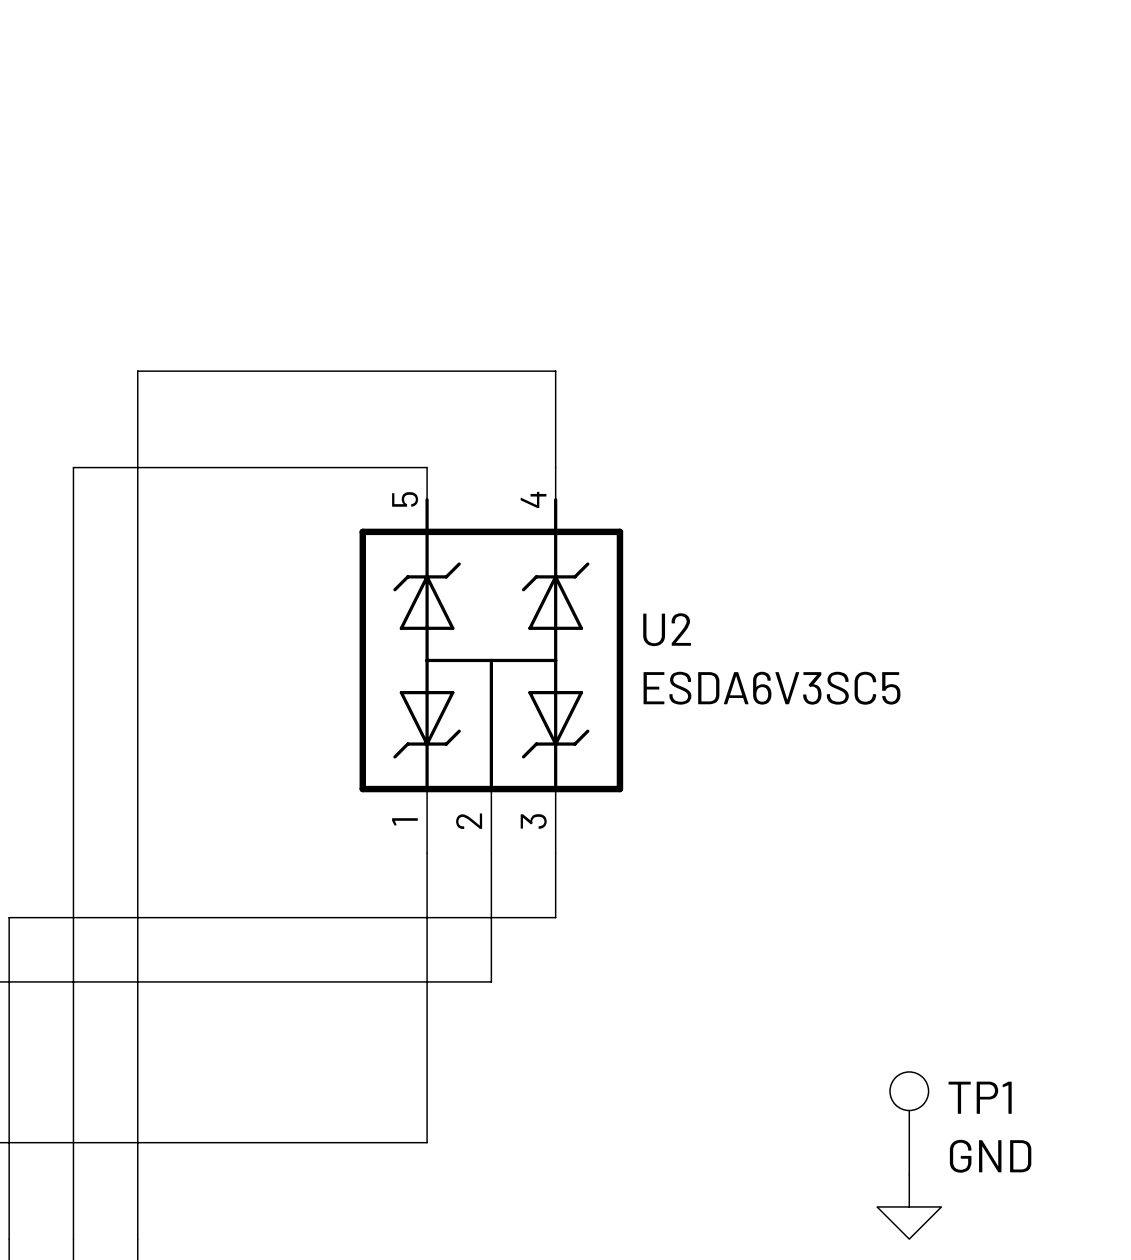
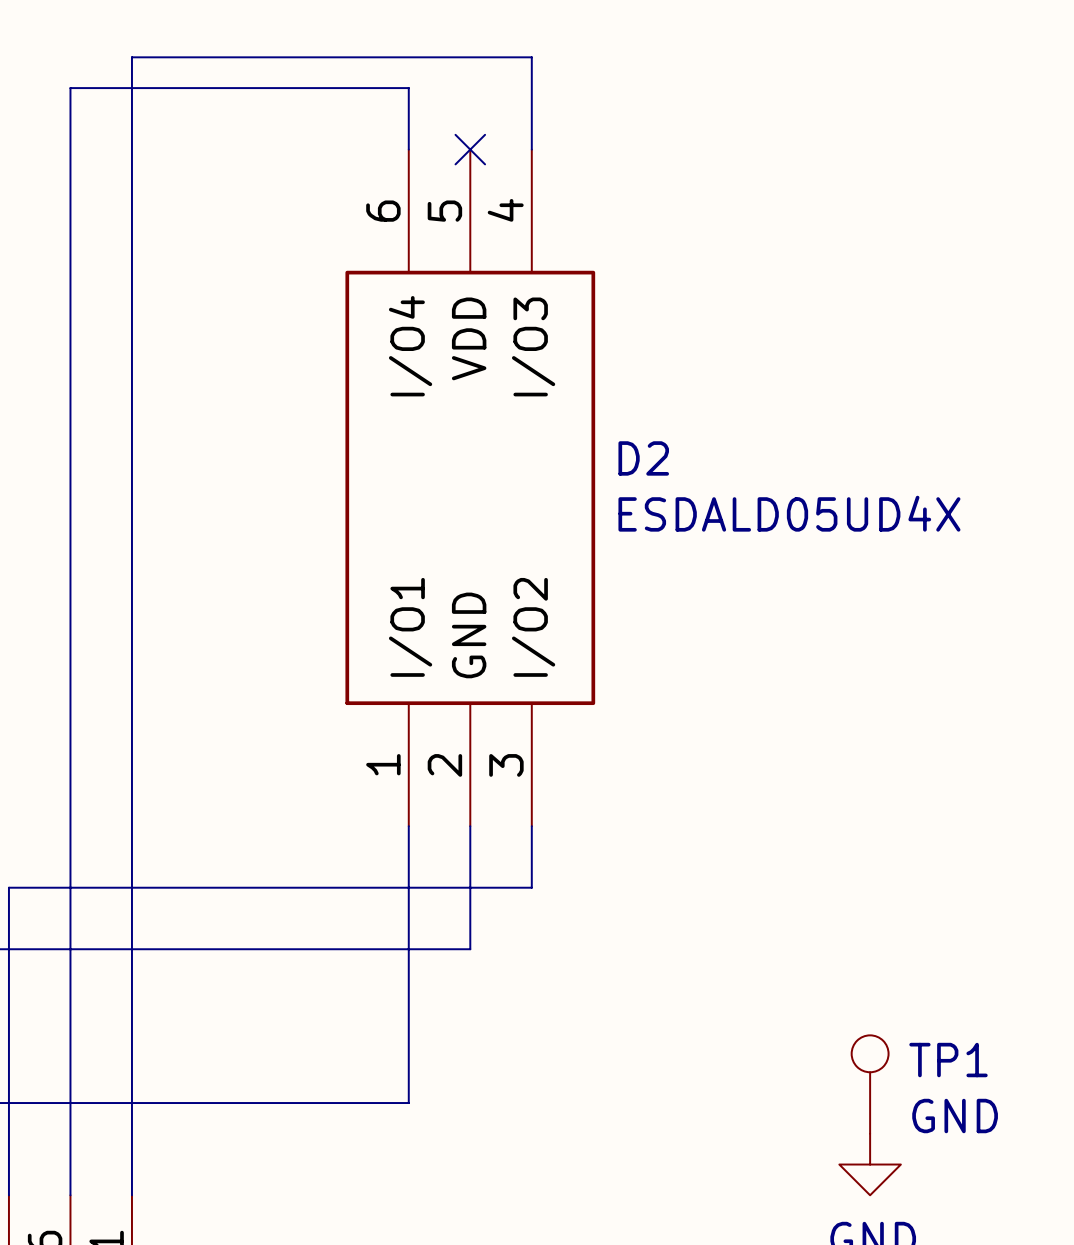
no-connect mark: none -> (470, 149)
wire: (137, 371) (555, 371) (555, 467) -> (131, 364) (131, 57) (531, 57) (531, 149)
wire: (73, 467) (427, 467) -> (70, 457) (70, 88) (408, 88) (408, 149)
D2: none -> ESDALD05UD4X (470, 487)
U2: ESDA6V3SC5 (491, 660) -> none

